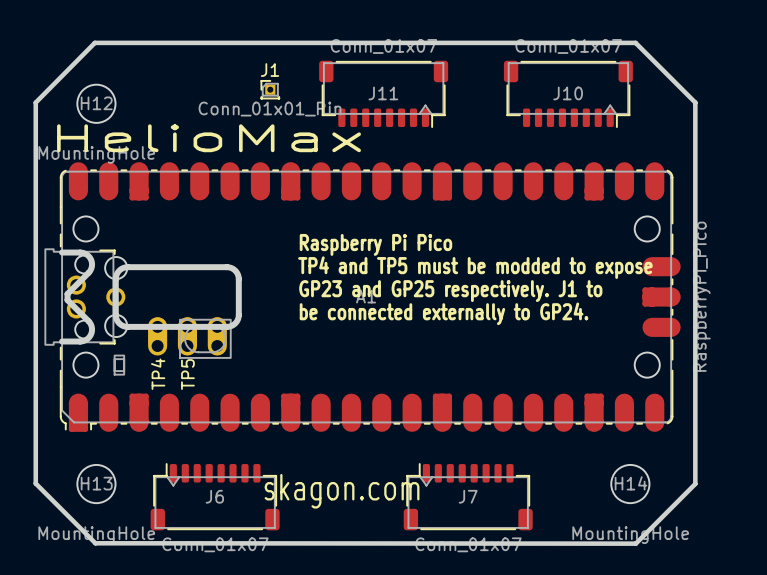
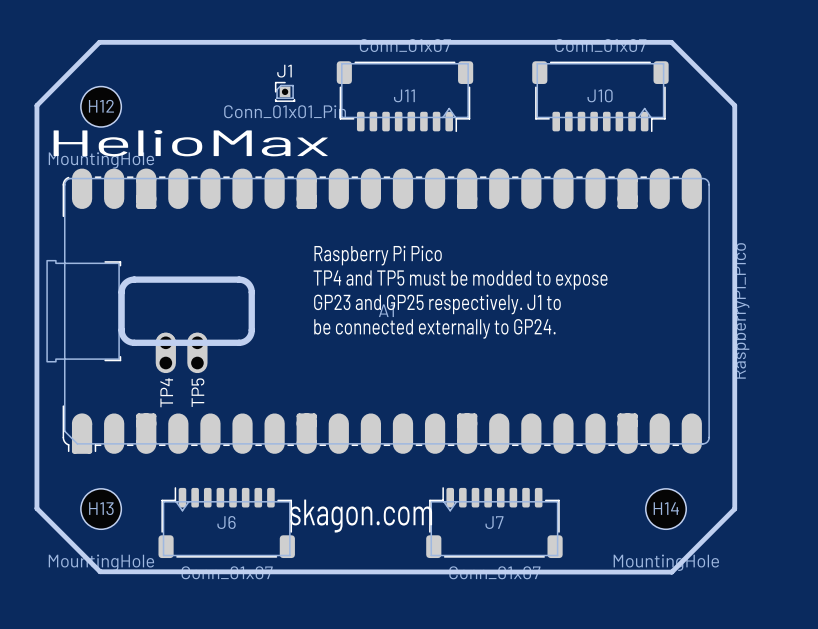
A1 footprint: [44, 162, 681, 432] -> [46, 168, 710, 454]

